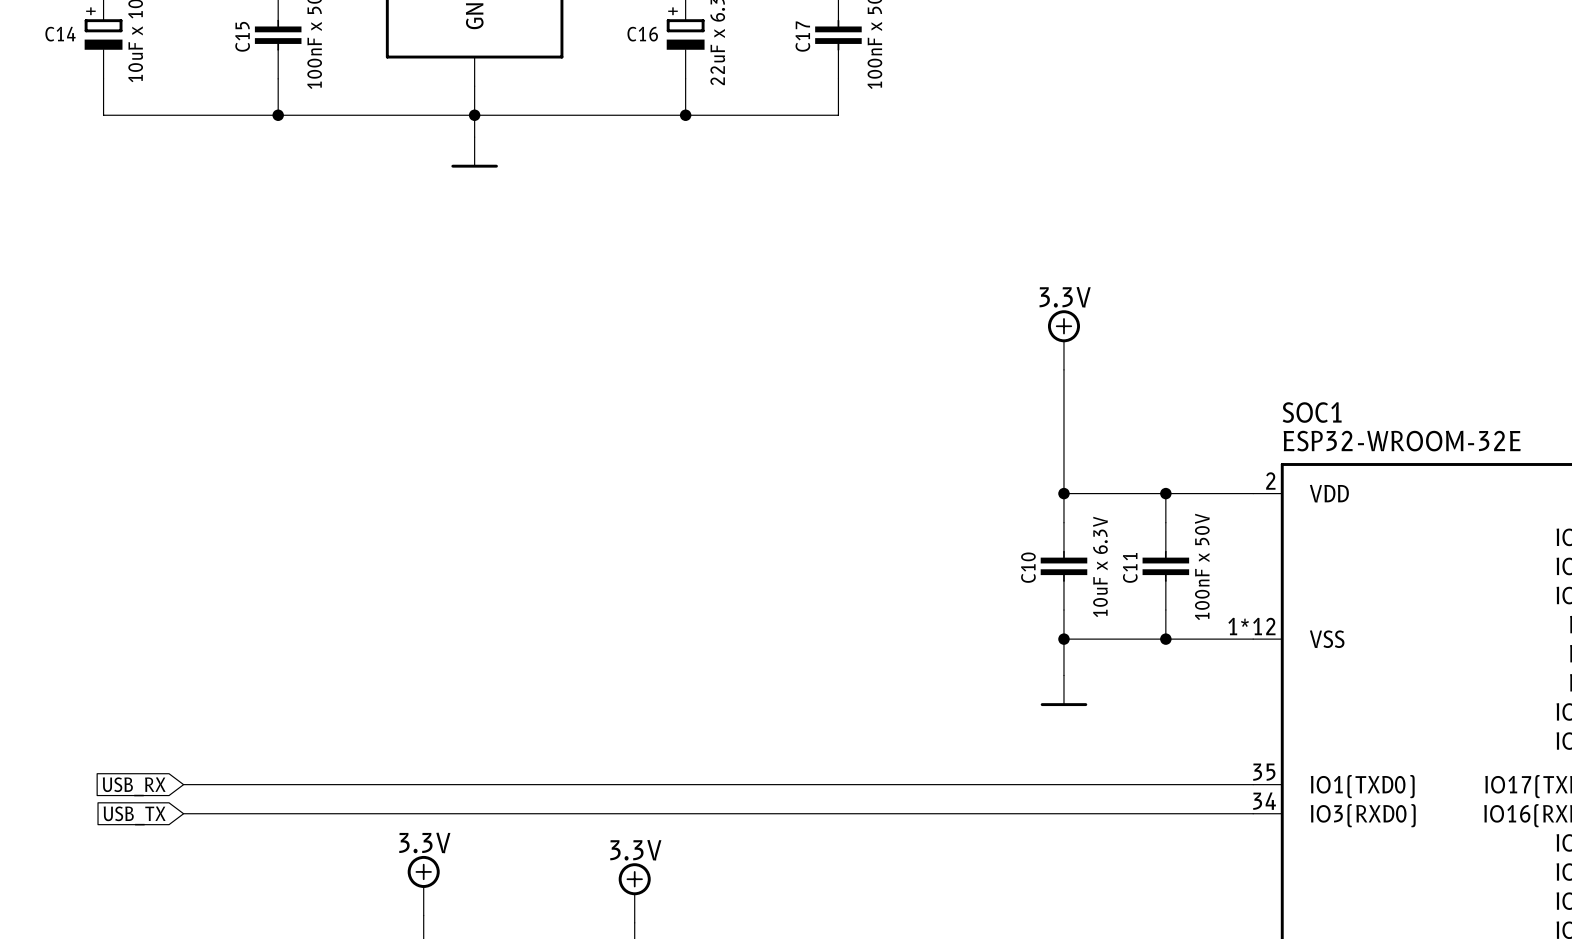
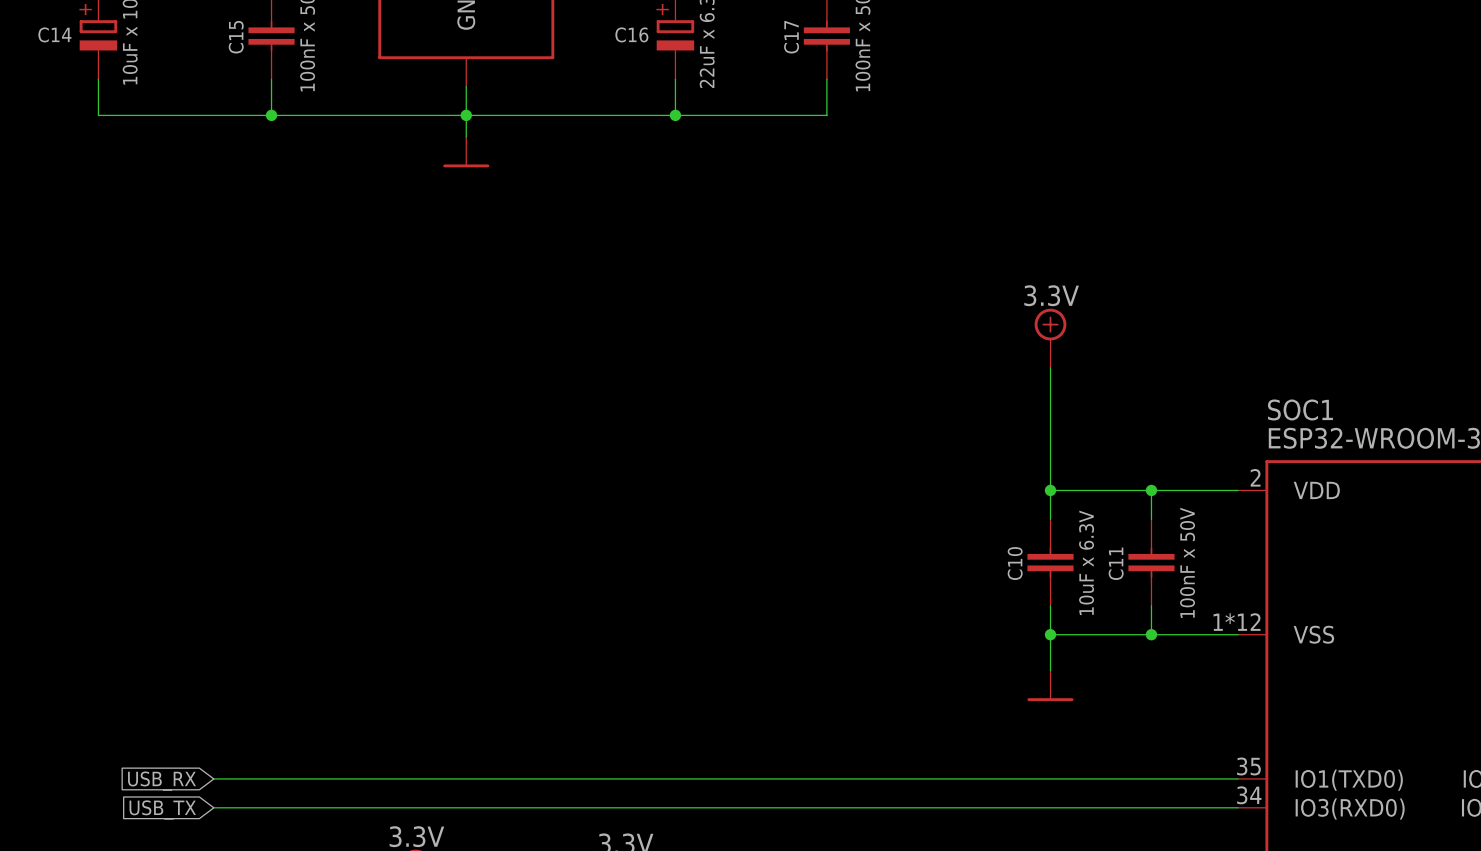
wire: (183, 784) (219, 784) -> none
global label position: USB_RX (134, 786) -> USB_RX (162, 781)
wire: (183, 813) (219, 813) -> none
global label position: USB_TX (134, 815) -> USB_TX (162, 810)

